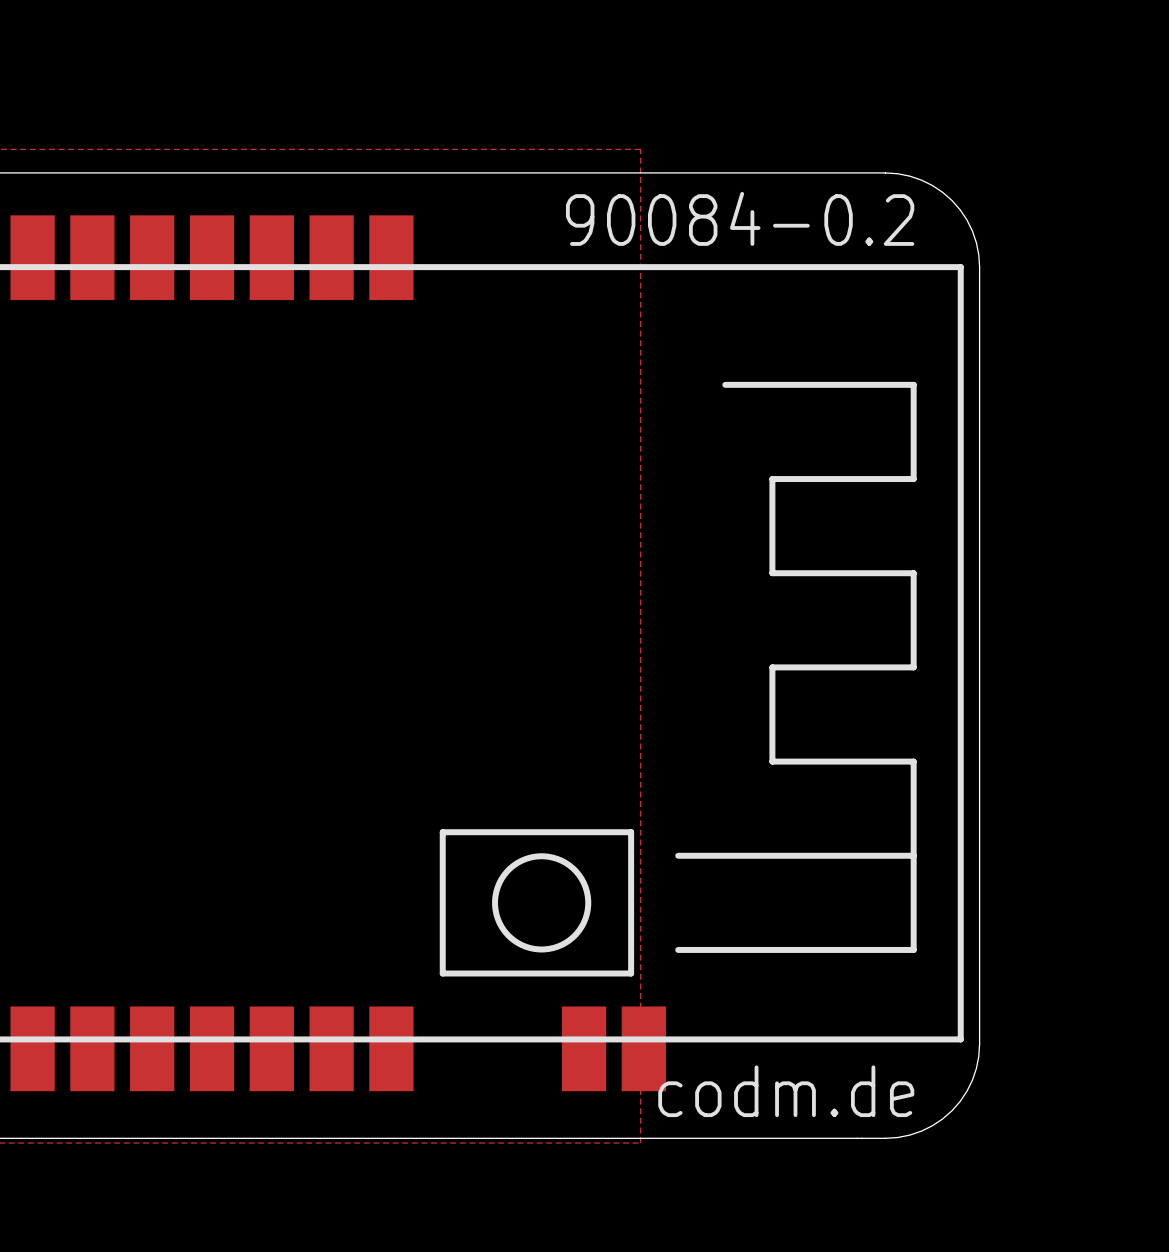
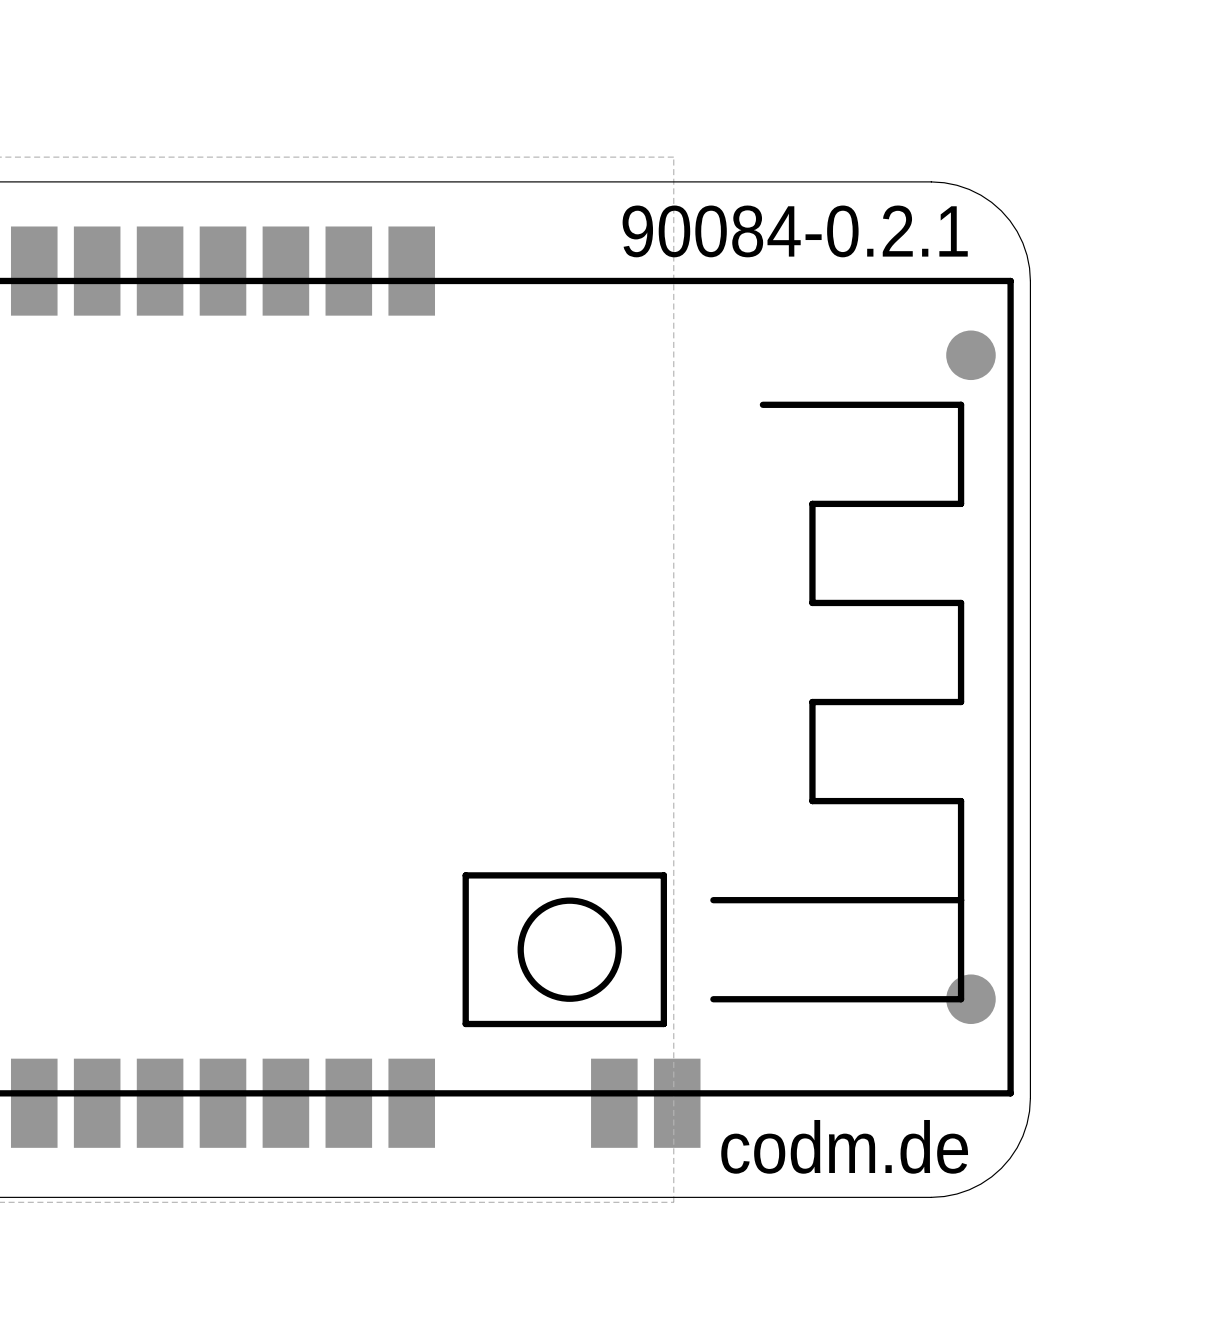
text: 90084-0.2 (740, 218) -> 90084-0.2.1 (795, 231)
part: none -> (970, 355)
part: none -> (970, 999)

